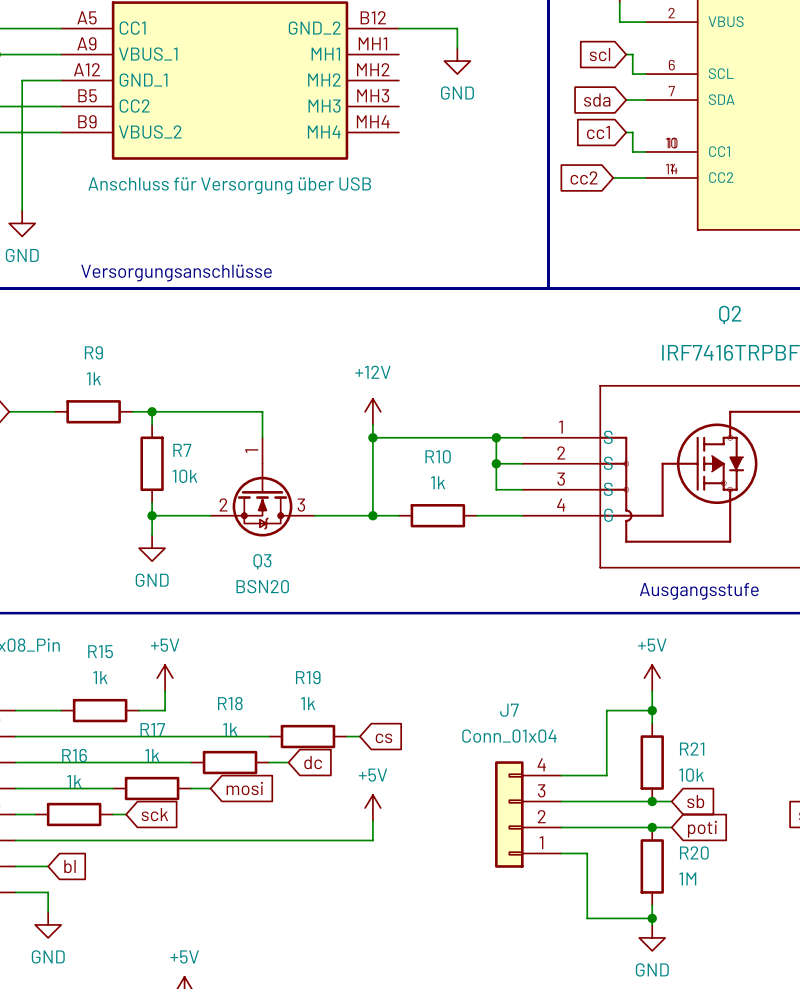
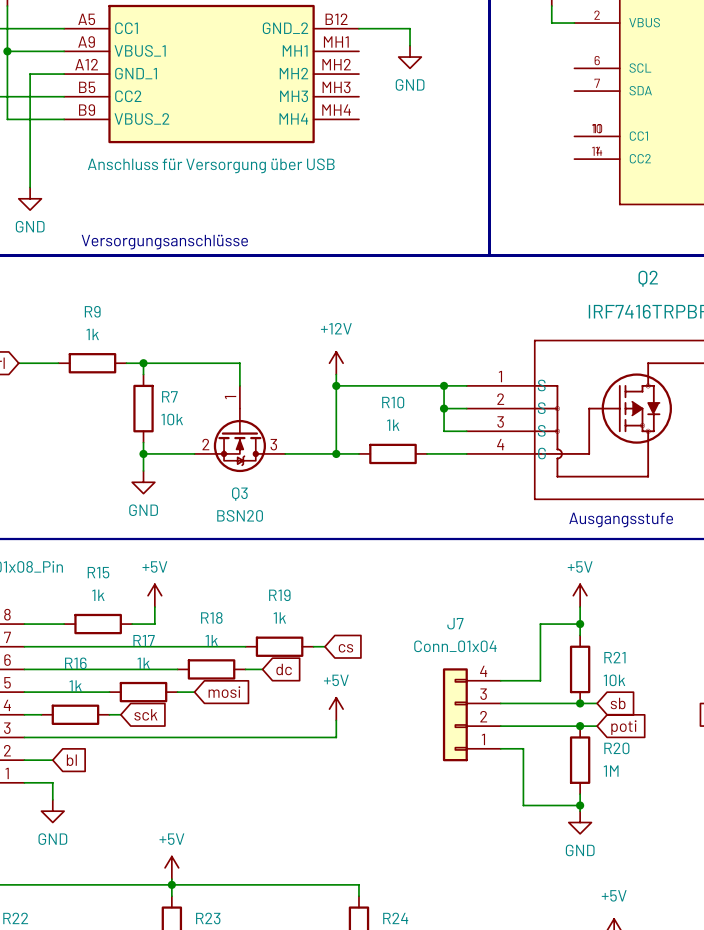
global label: scl (599, 54) -> none
wire: (626, 54) (632, 54) (632, 74) (645, 74) -> none
global label: sda (597, 100) -> none
wire: (626, 100) (645, 100) -> none
global label: cc1 (598, 132) -> none
wire: (626, 132) (632, 132) (632, 151) (645, 151) -> none
global label: cc2 (584, 177) -> none
wire: (613, 177) (645, 177) -> none

